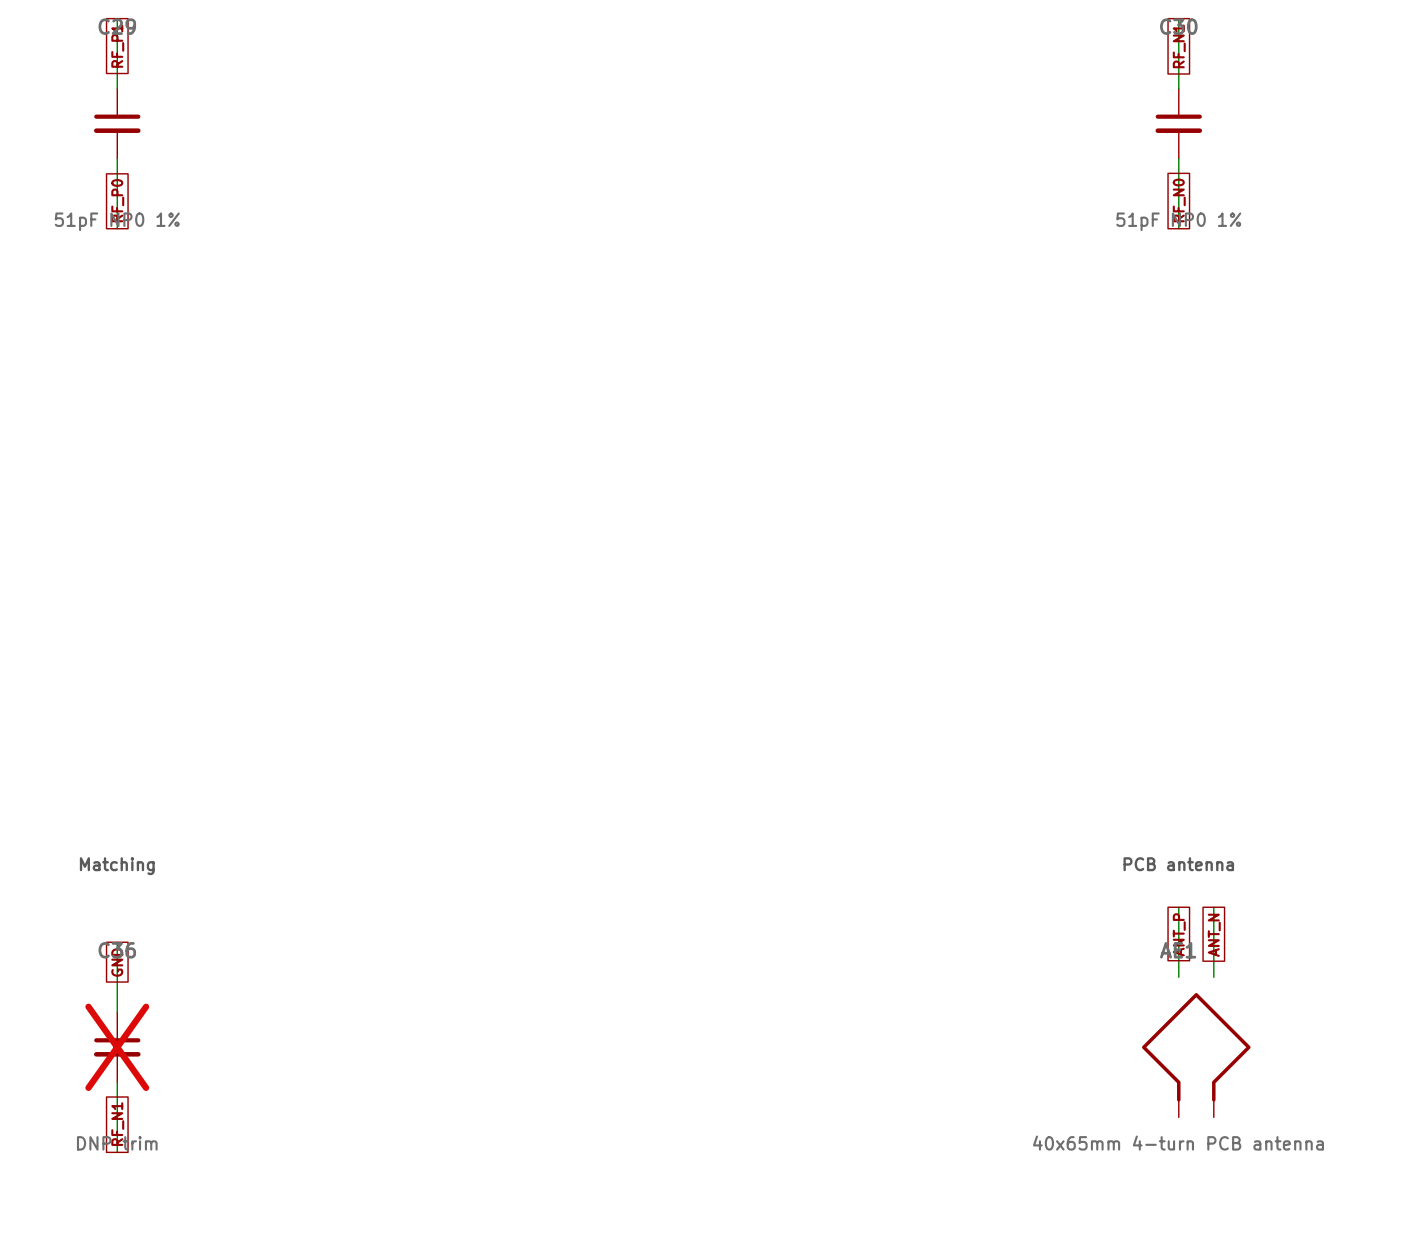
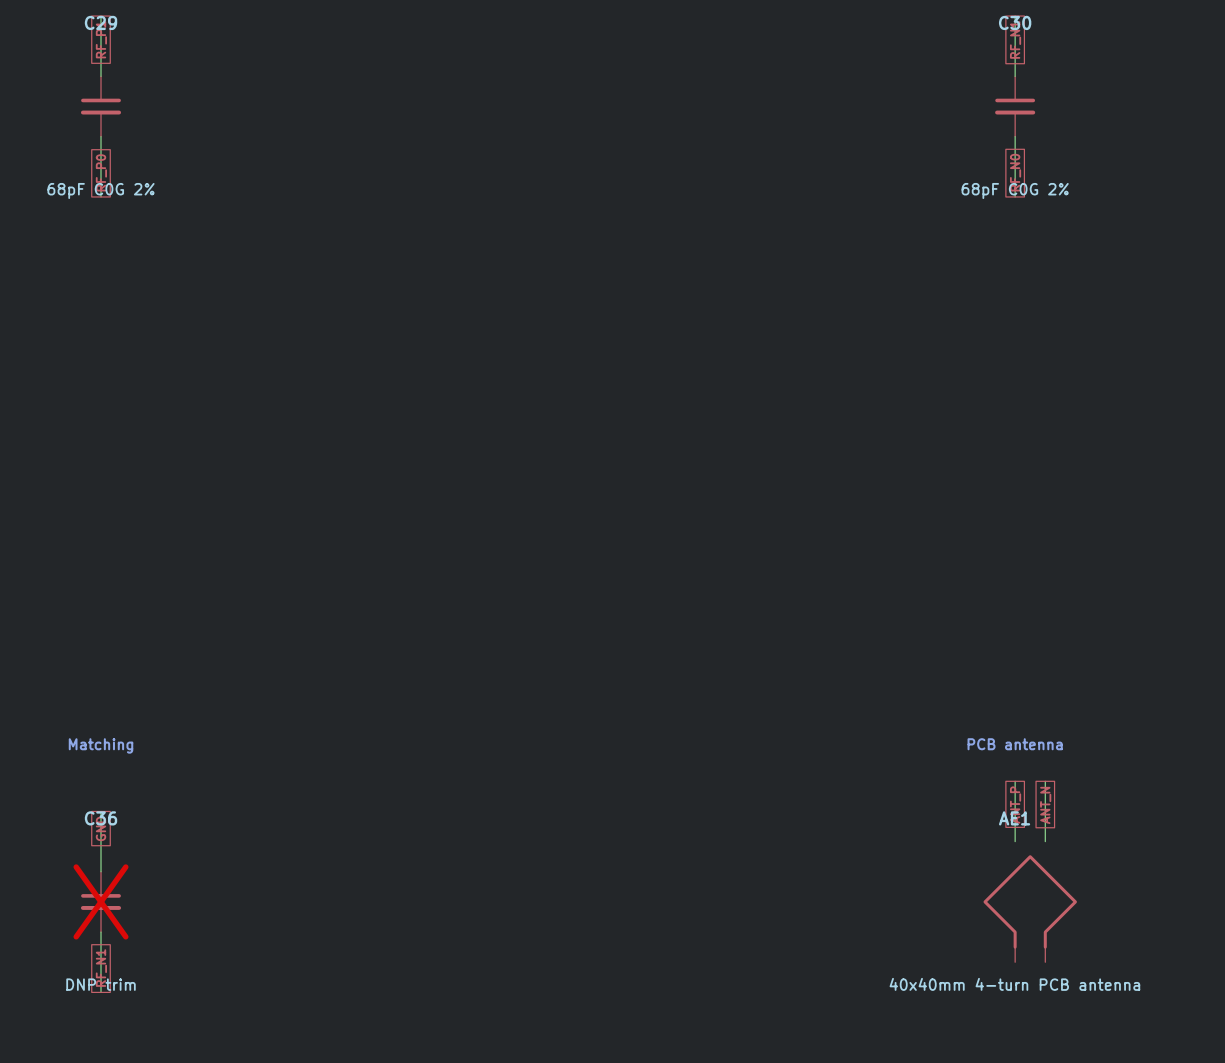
C29 value: 51pF NP0 1% (117, 221) -> 68pF C0G 2% (101, 190)
C30 value: 51pF NP0 1% (1178, 221) -> 68pF C0G 2% (1015, 190)
AE1 value: 40x65mm 4-turn PCB antenna (1178, 1143) -> 40x40mm 4-turn PCB antenna (1014, 984)

